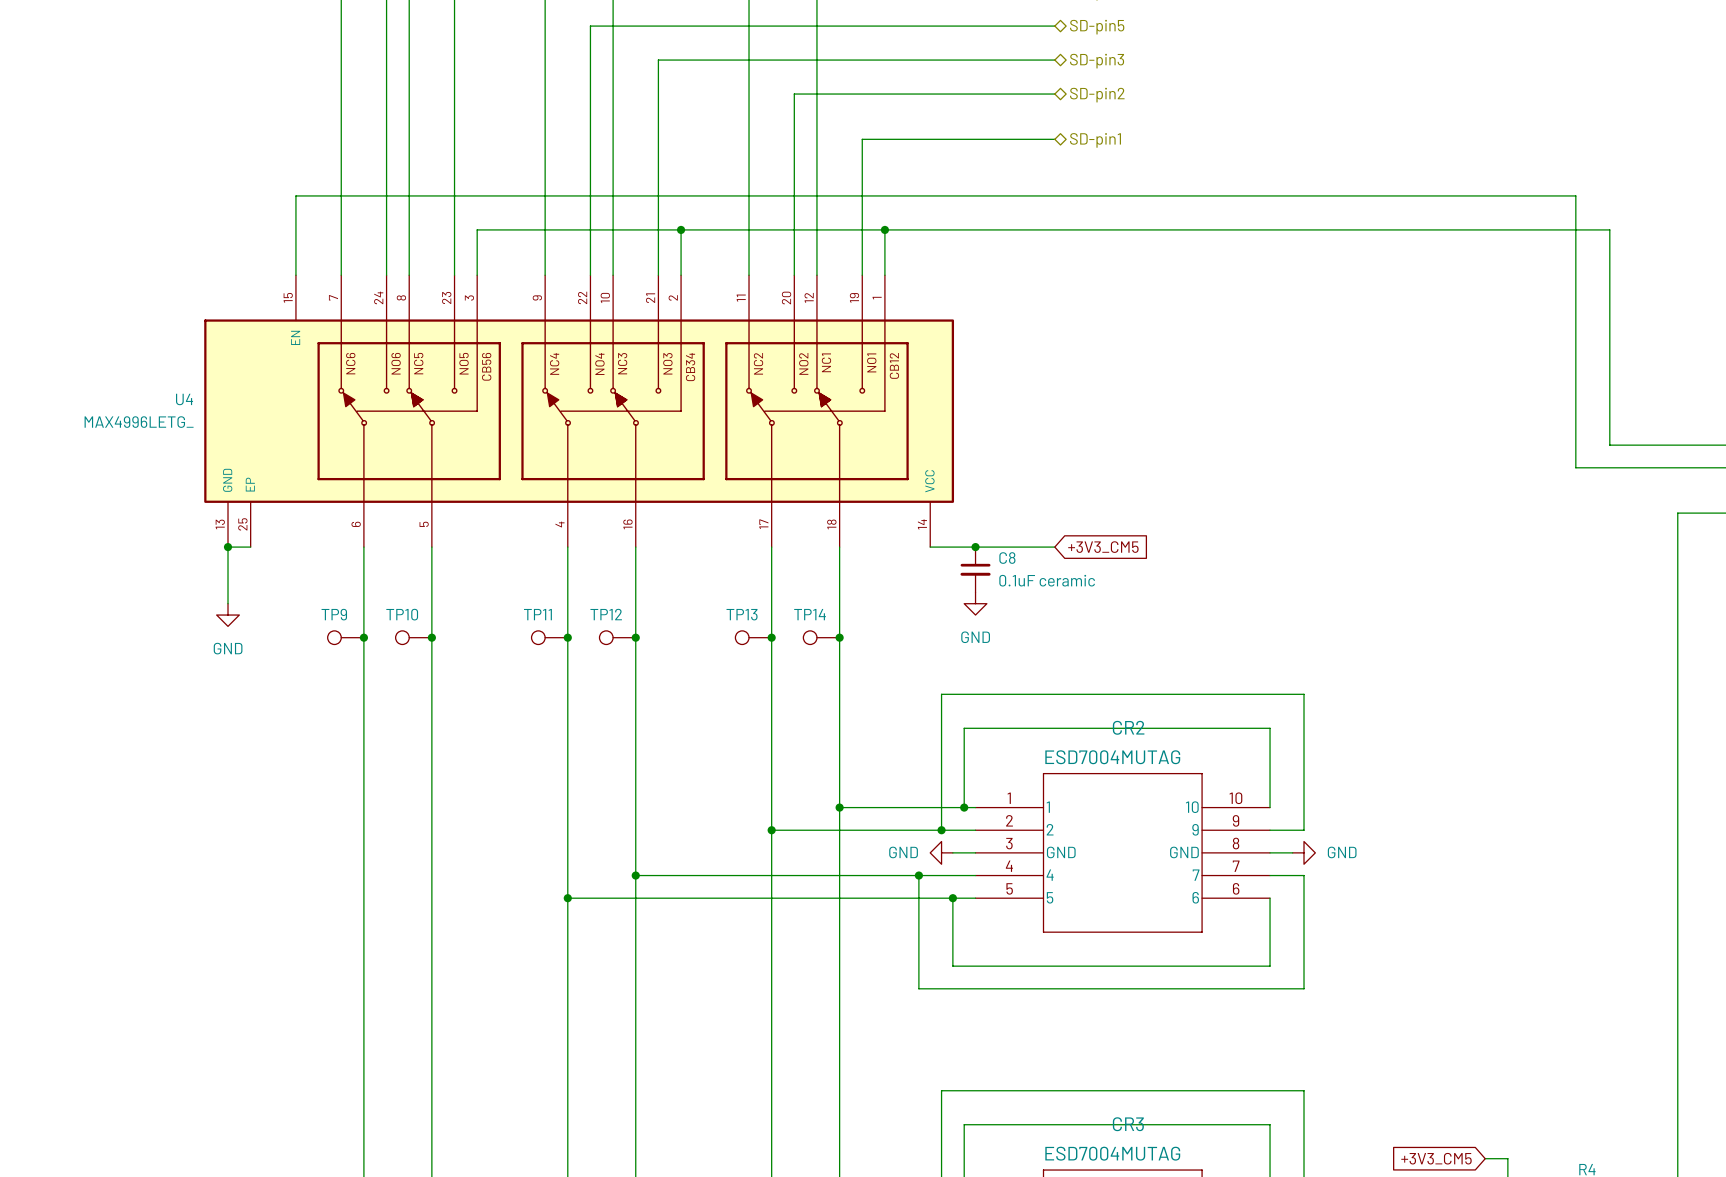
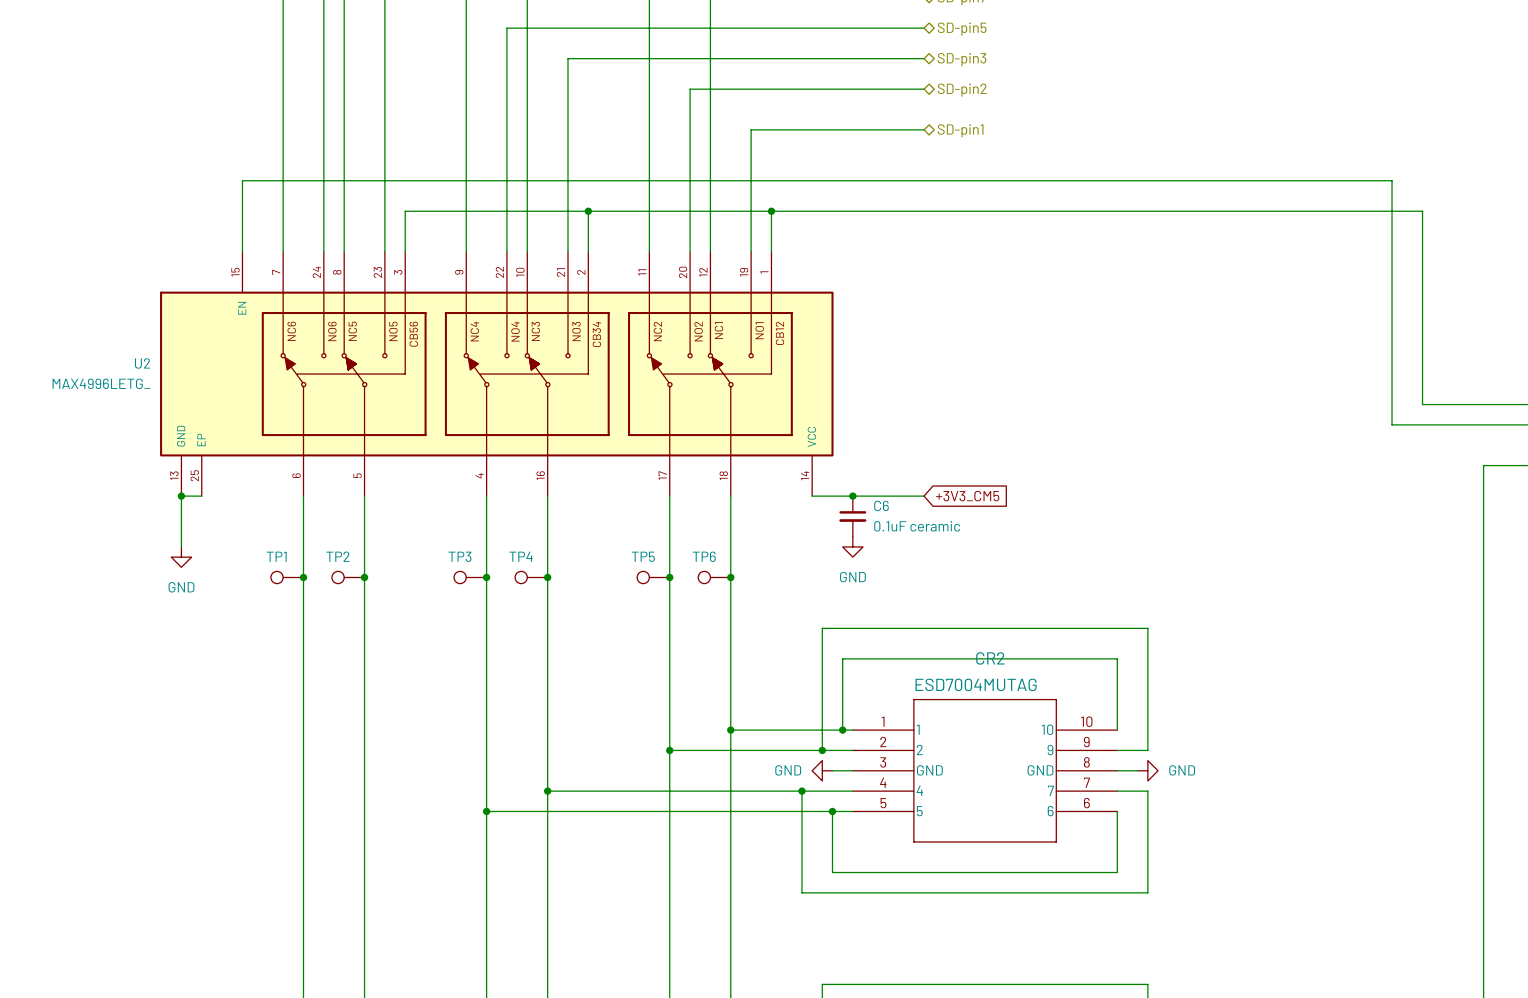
U4 name: U4 (184, 399) -> U2 (142, 363)
C8 name: C8 (1007, 558) -> C6 (881, 505)
TP9 name: TP9 (334, 614) -> TP1 (276, 556)
TP10 name: TP10 (402, 614) -> TP2 (337, 556)
TP11 name: TP11 (537, 614) -> TP3 (460, 556)
TP12 name: TP12 (606, 614) -> TP4 (521, 556)
TP13 name: TP13 (742, 614) -> TP5 (643, 556)
TP14 name: TP14 (810, 614) -> TP6 (704, 556)

